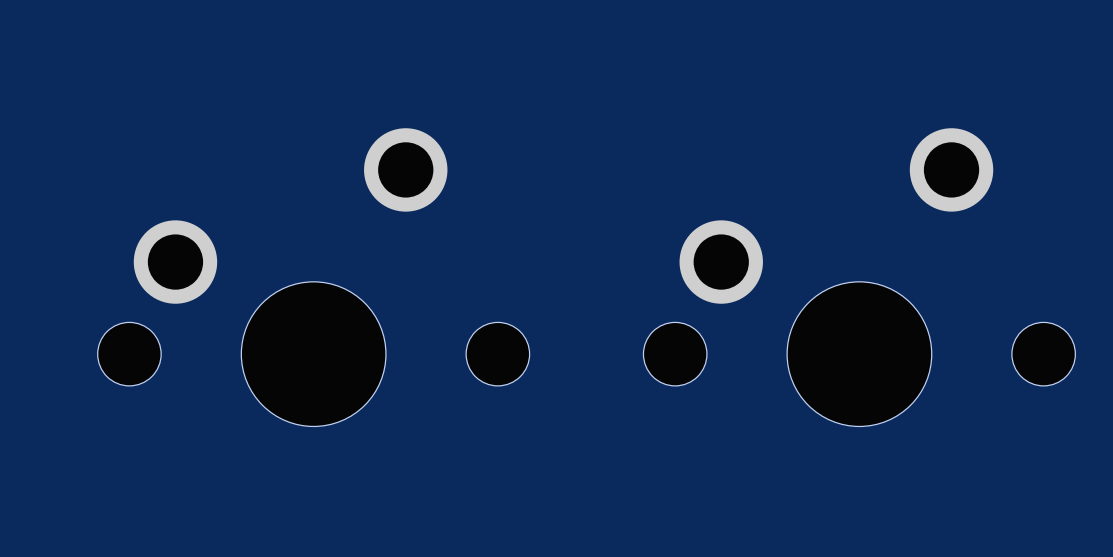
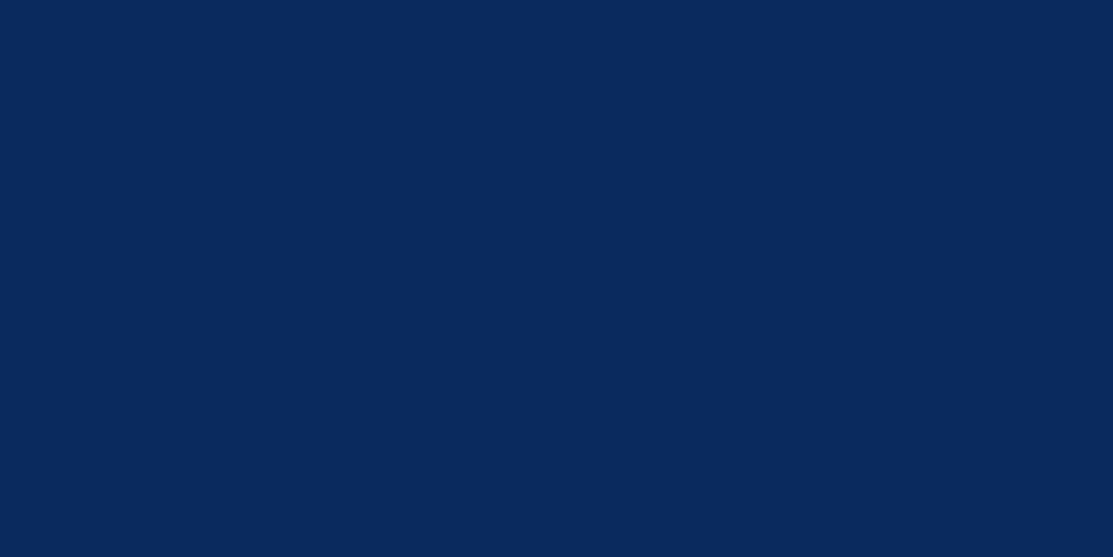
part: (313, 277) -> none
part: (859, 277) -> none

